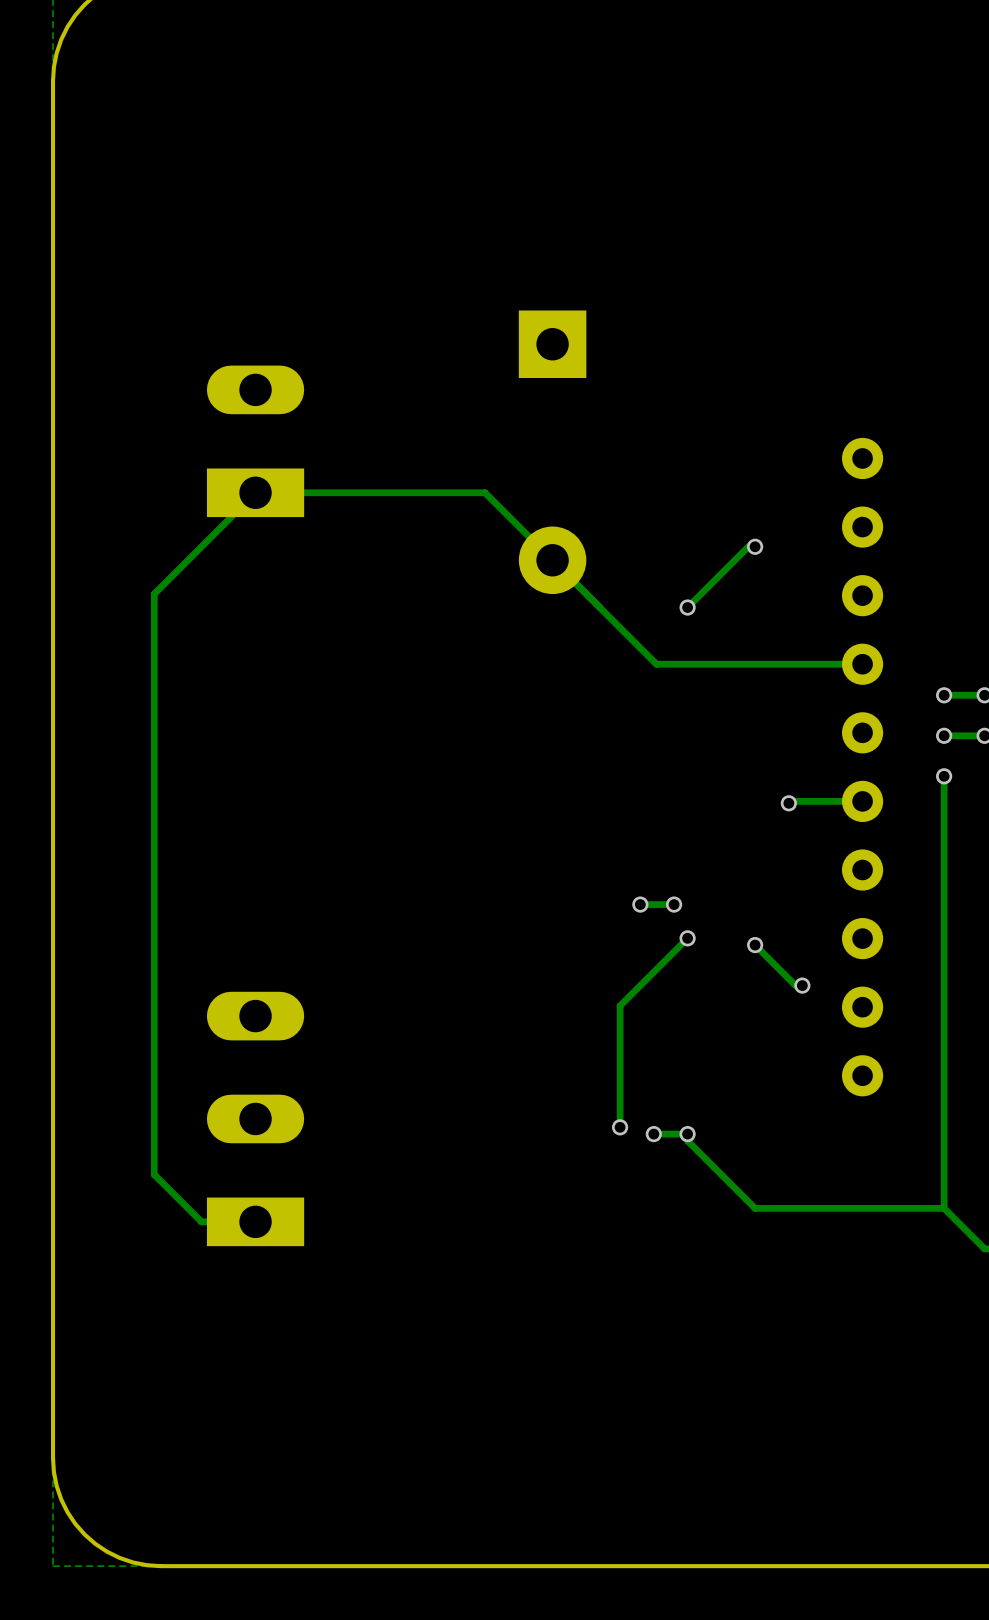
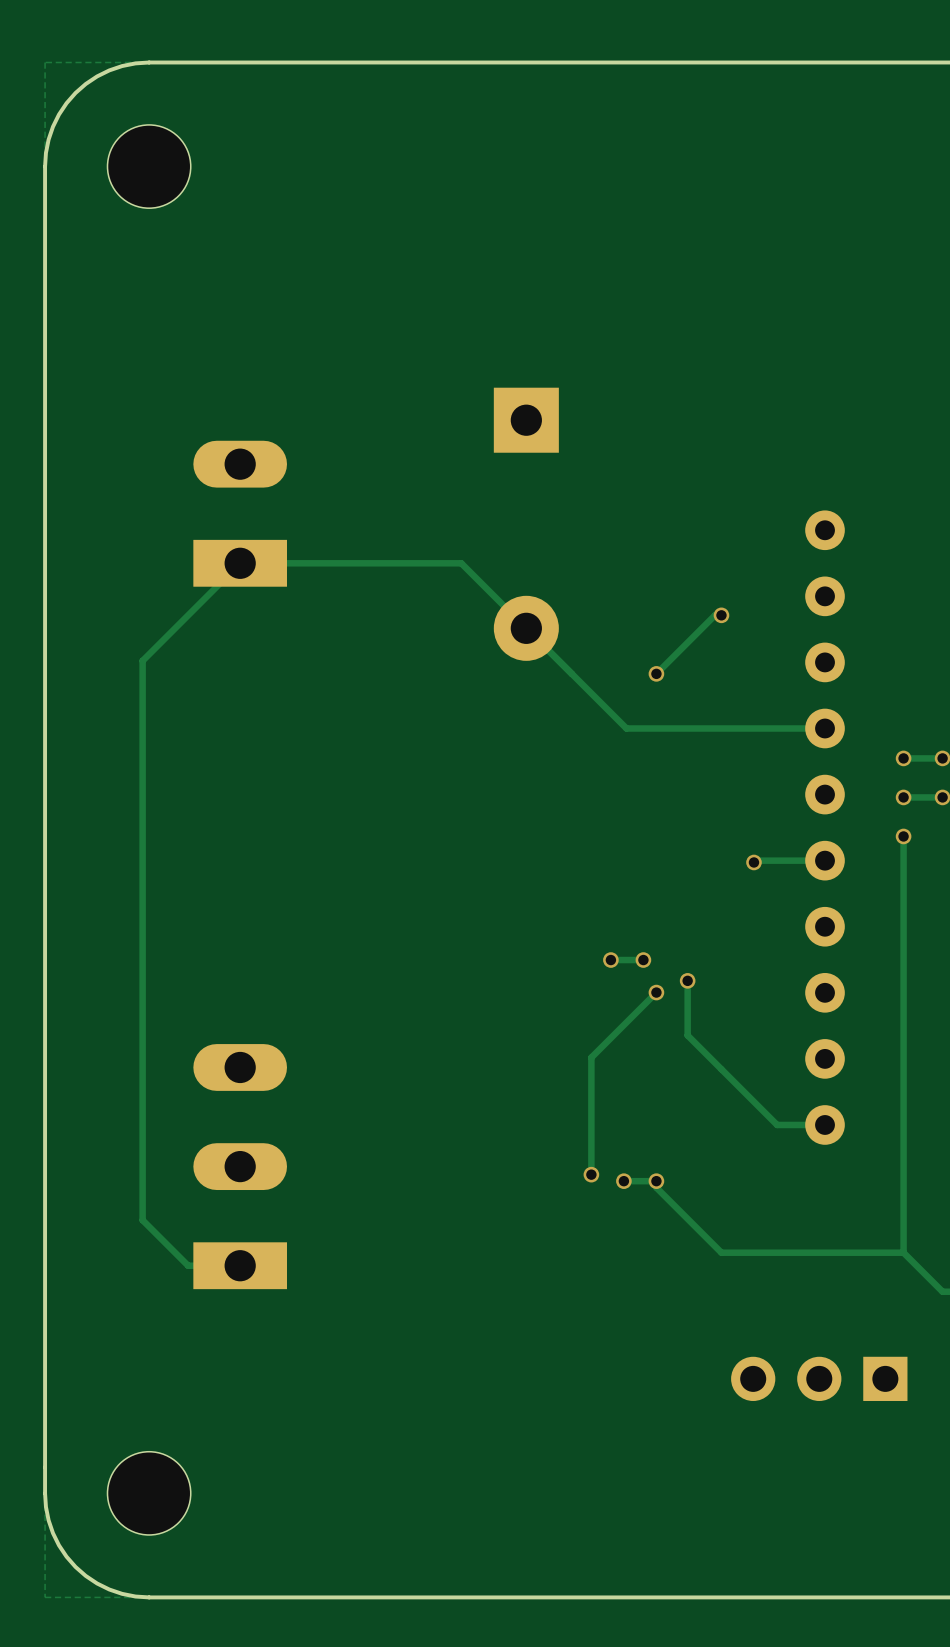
part: none -> (149, 166)
track: none -> (687, 980) (687, 1035) (777, 1124) (825, 1124)
track: (755, 945) (795, 985) (802, 985) -> none
via position: (755, 945) -> (687, 980)
via: (802, 985) -> none
part: none -> (819, 1378)
part: none -> (149, 1493)

